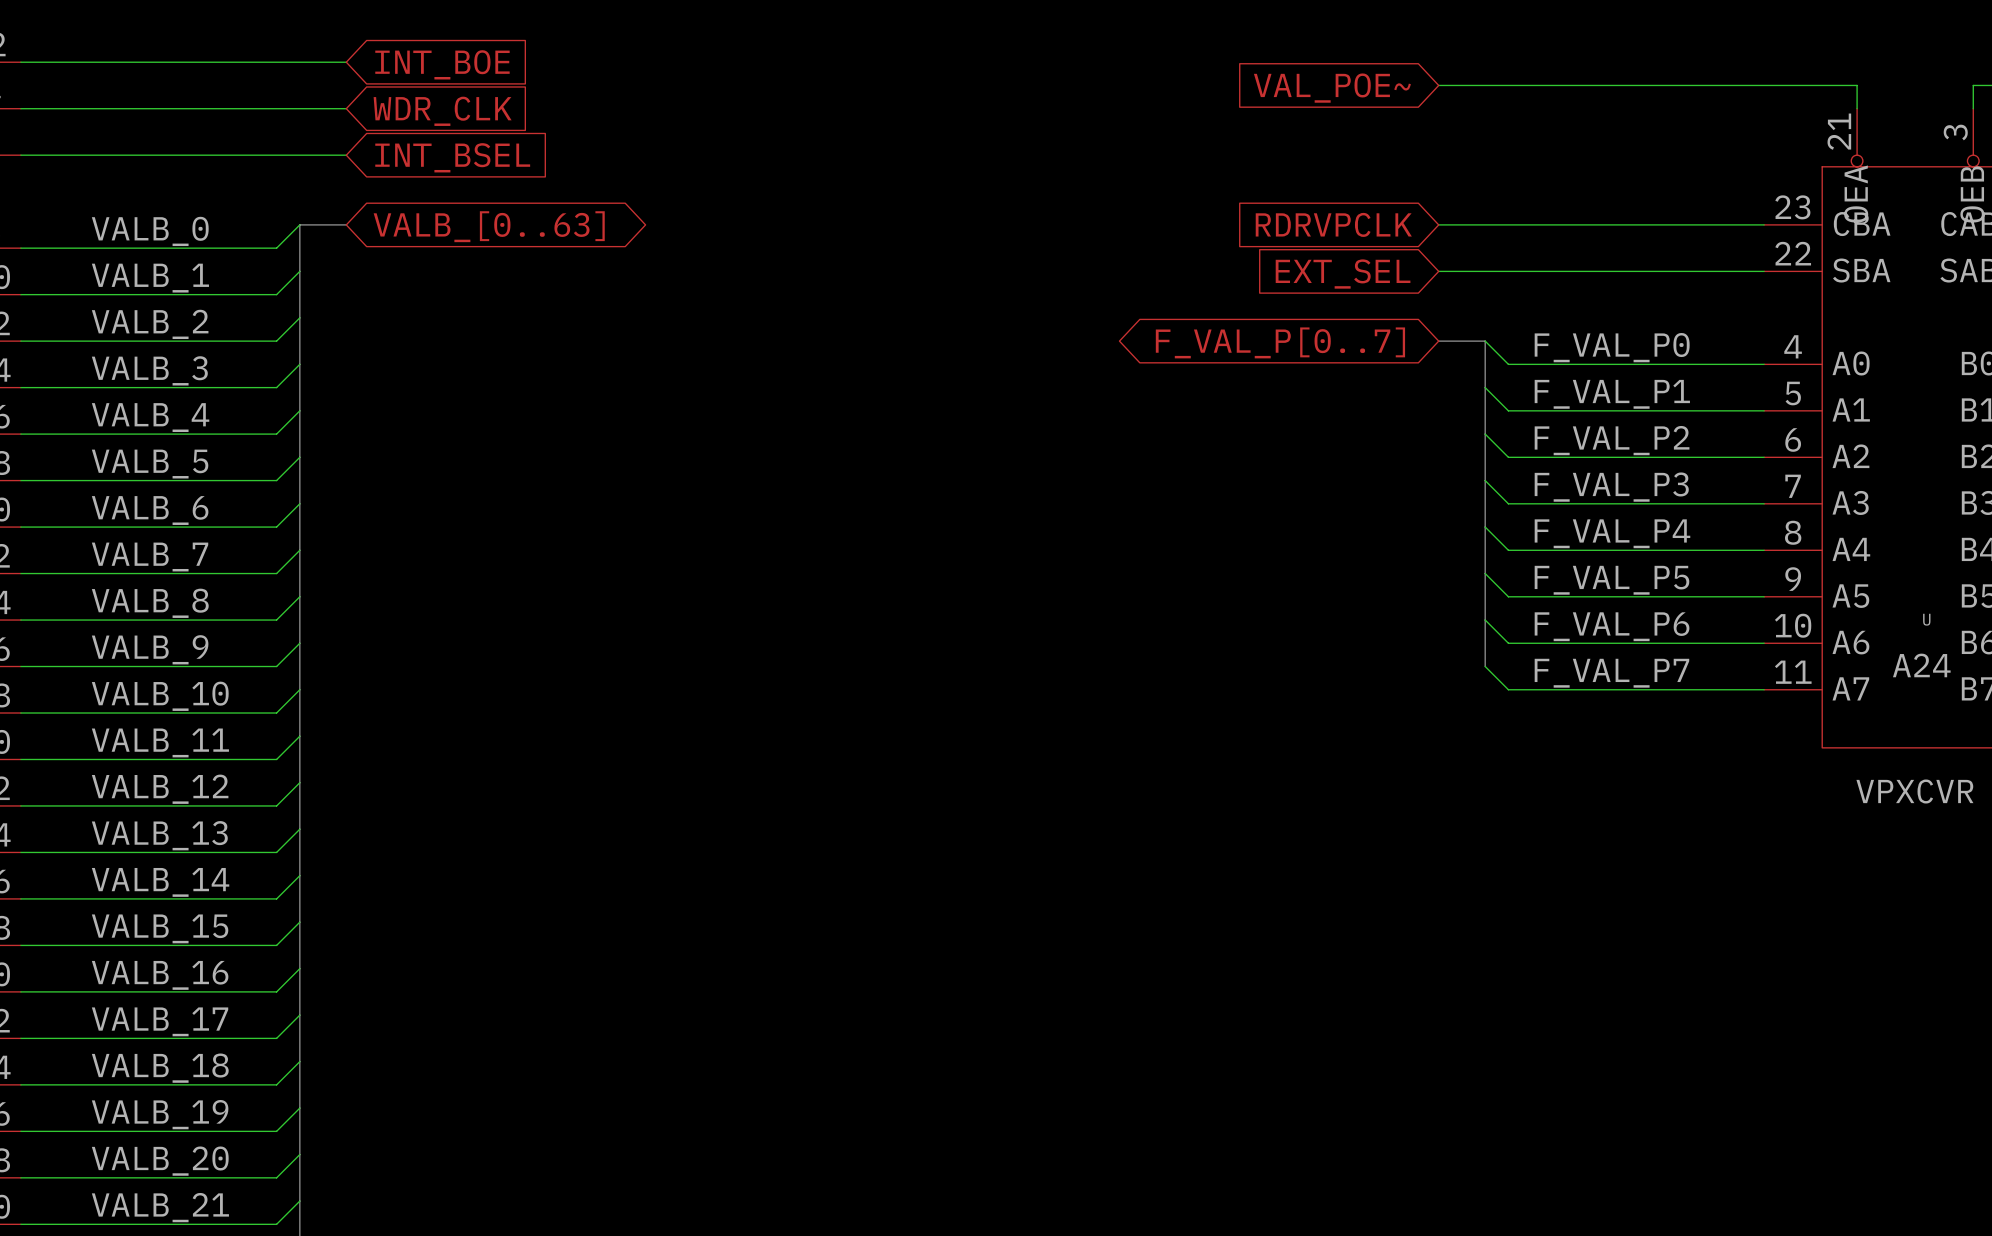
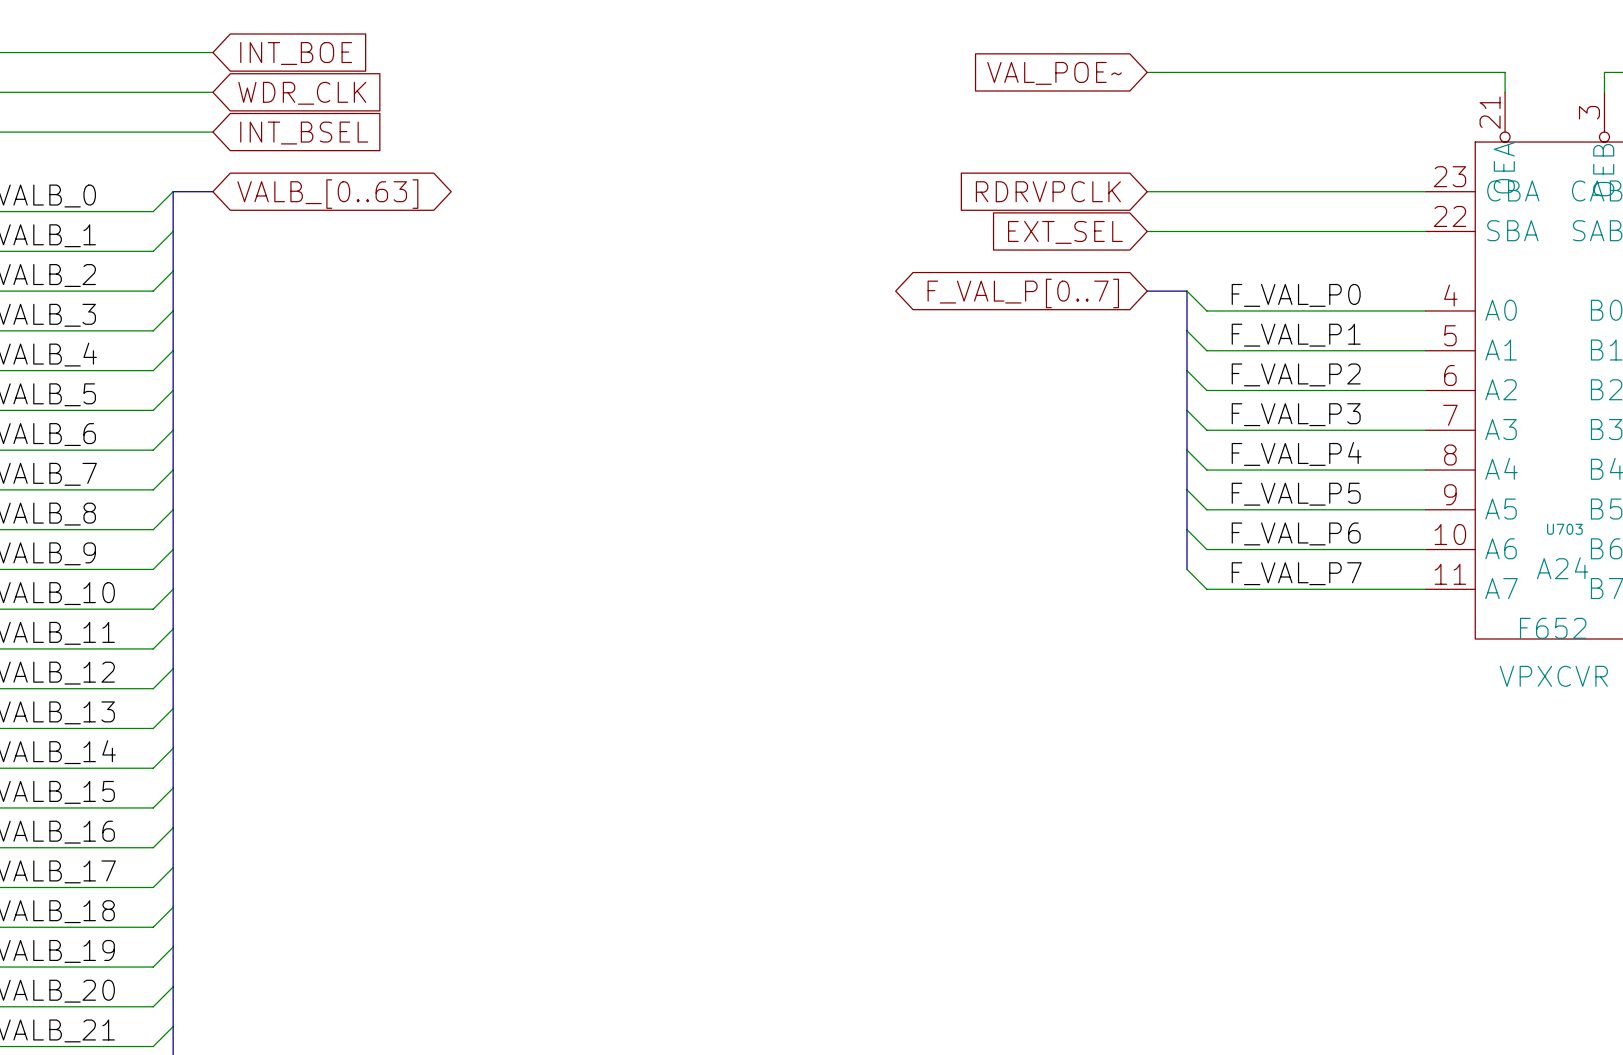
U name: U (1926, 619) -> U703 (1564, 529)
U value: none -> F652 (1553, 628)

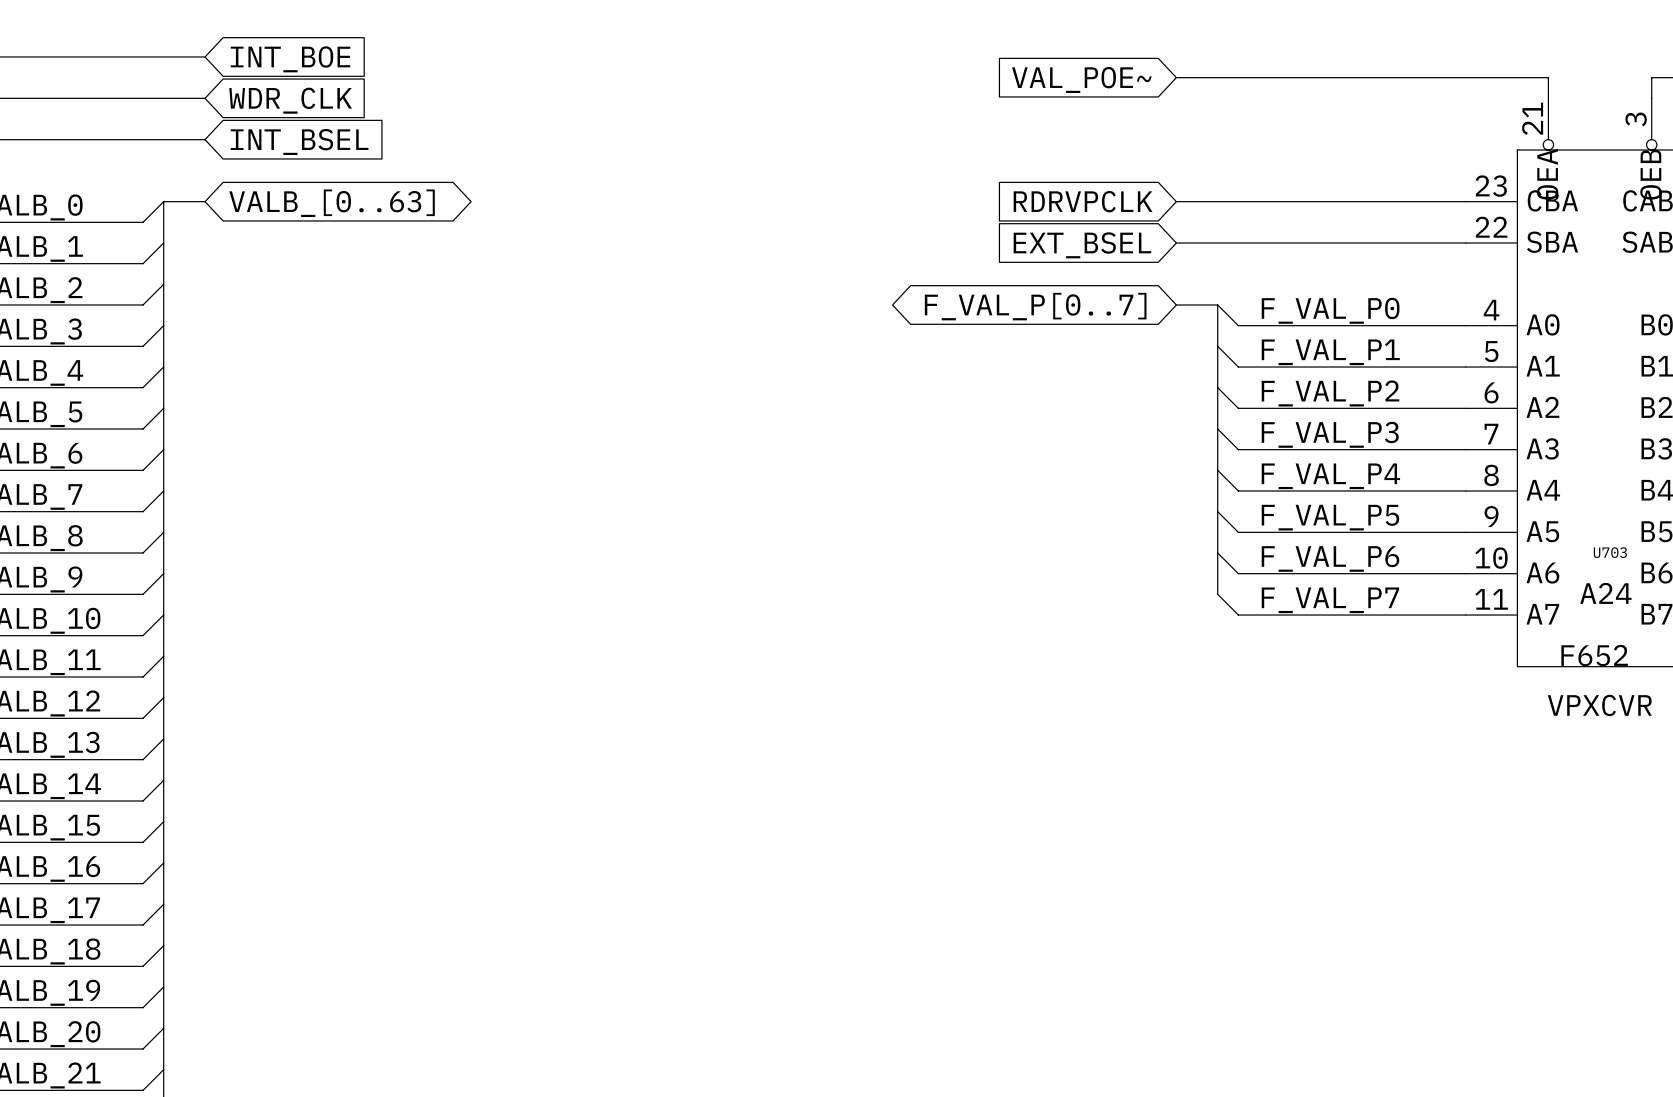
global label: EXT_SEL (1065, 232) -> EXT_BSEL (1082, 245)

